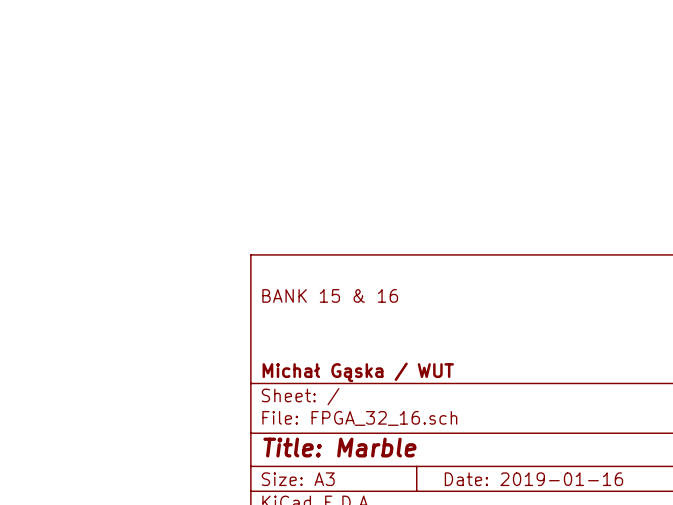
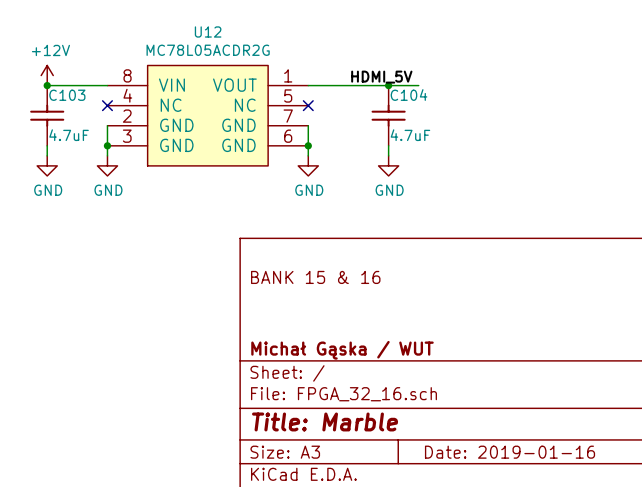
power symbol: none -> +12V (47, 75)
label: none -> HDMI_5V (381, 77)
wire: none -> (47, 85) (107, 85)
junction: none -> (47, 85)
wire: none -> (308, 85) (418, 85)
junction: none -> (388, 85)
no-connect mark: none -> (107, 105)
no-connect mark: none -> (308, 105)
C103: none -> (47, 115)
U12: none -> MC78L05ACDR2G (207, 115)
C104: none -> (388, 115)
wire: none -> (107, 125) (107, 155)
wire: none -> (308, 125) (308, 155)
wire: none -> (47, 145) (47, 155)
junction: none -> (107, 145)
junction: none -> (308, 145)
wire: none -> (388, 145) (388, 155)
power symbol: none -> GND (47, 165)
power symbol: none -> GND (107, 165)
power symbol: none -> GND (308, 165)
power symbol: none -> GND (388, 165)

